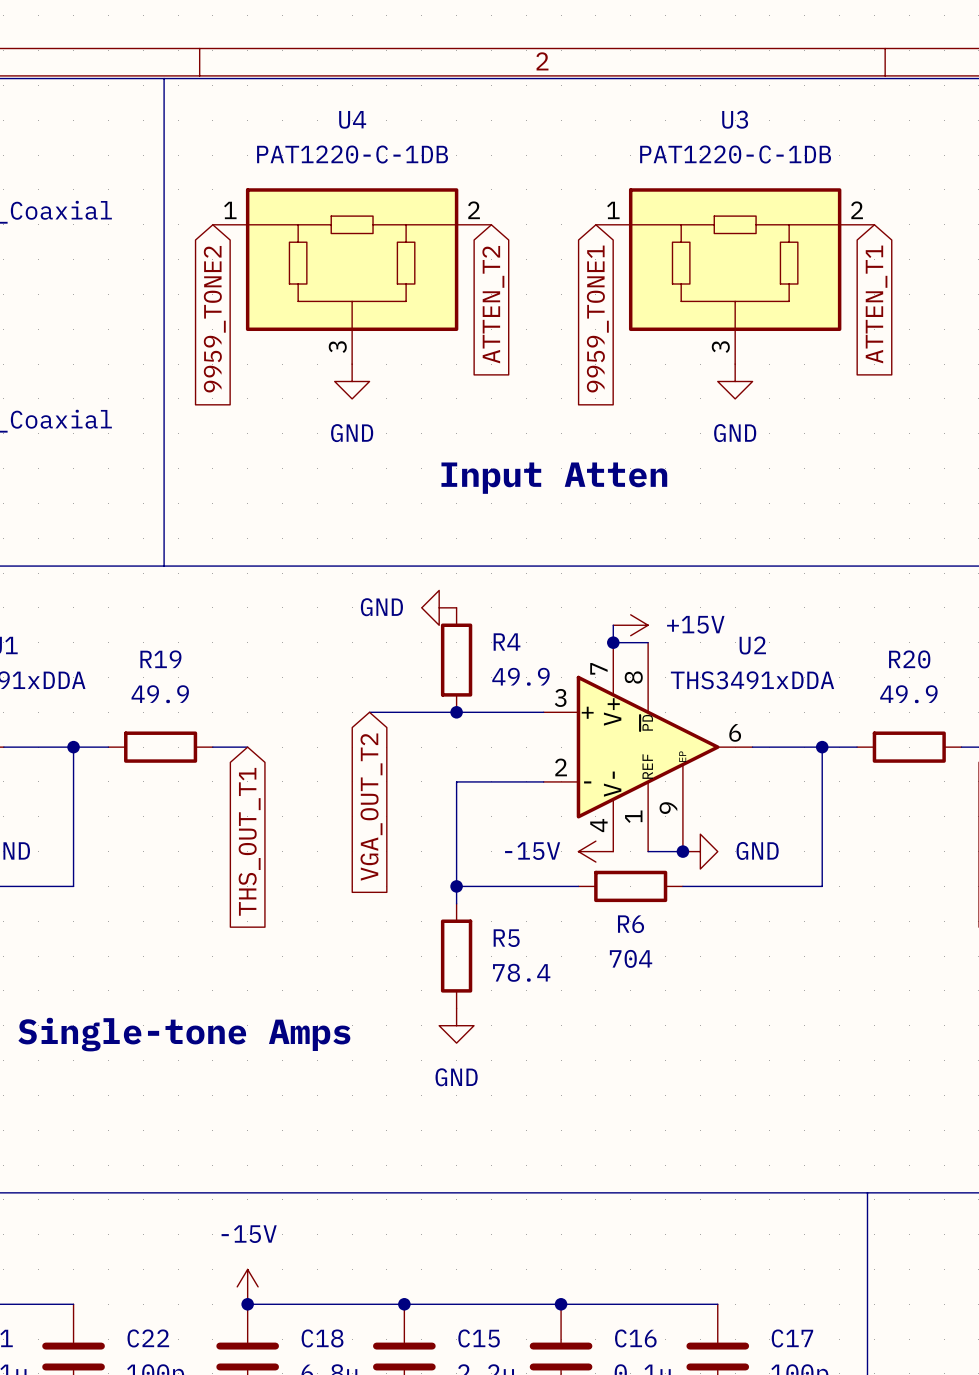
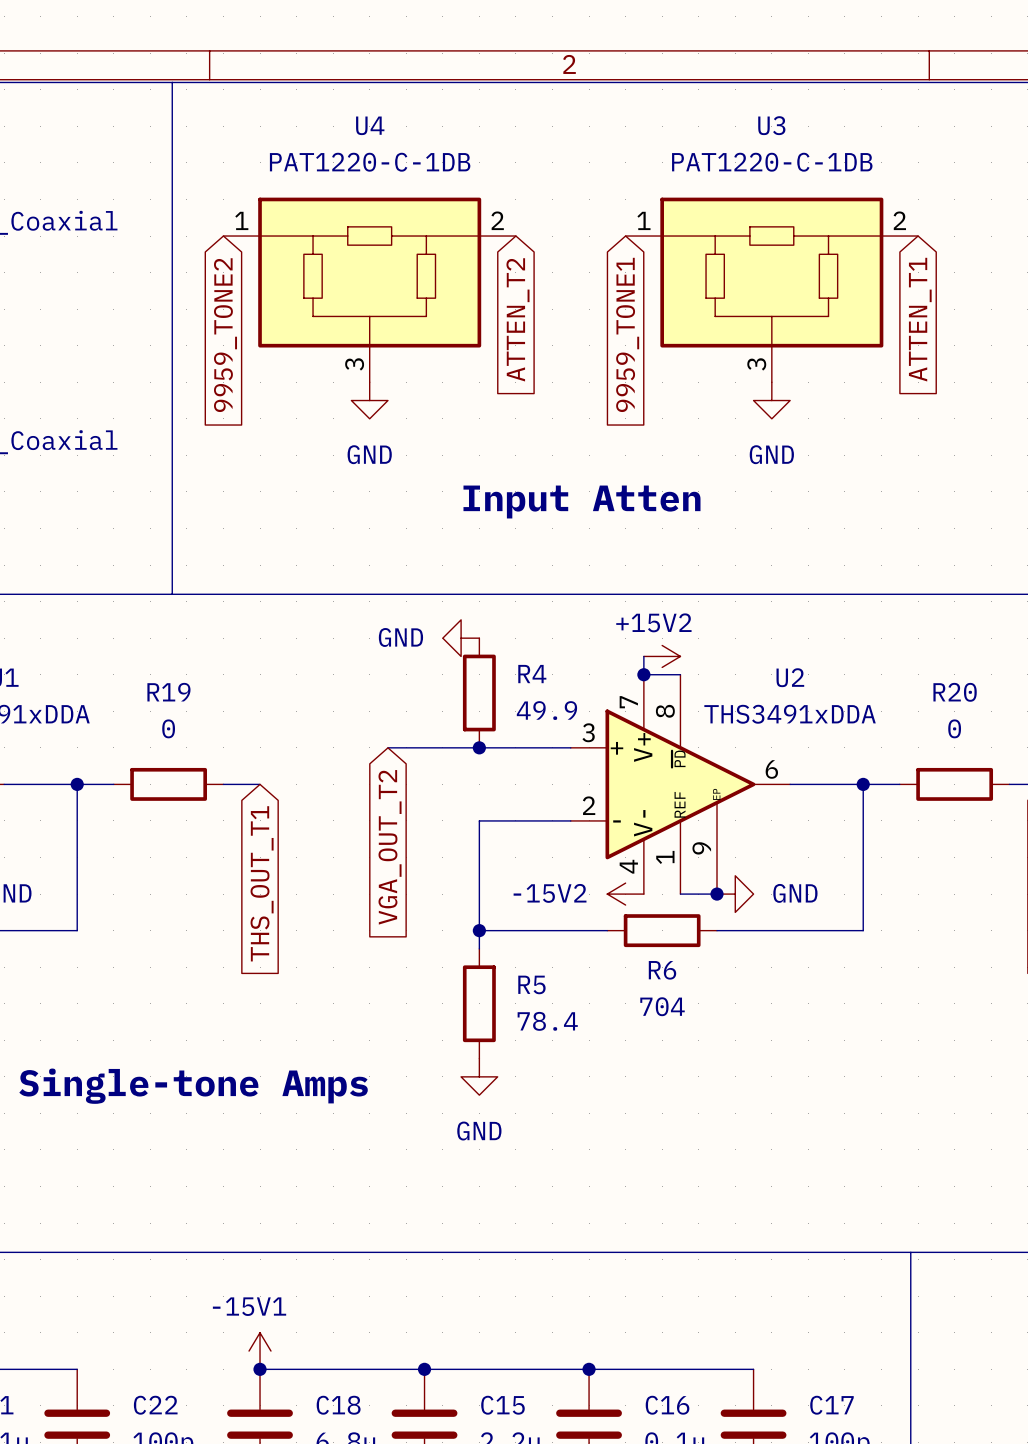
power symbol: +15V (630, 625) -> +15V2 (662, 656)
R19 value: 49.9 (160, 694) -> 0 (168, 728)
R20 value: 49.9 (908, 694) -> 0 (954, 728)
power symbol: -15V (595, 851) -> -15V2 (625, 894)
power symbol: -15V (247, 1286) -> -15V1 (260, 1351)

